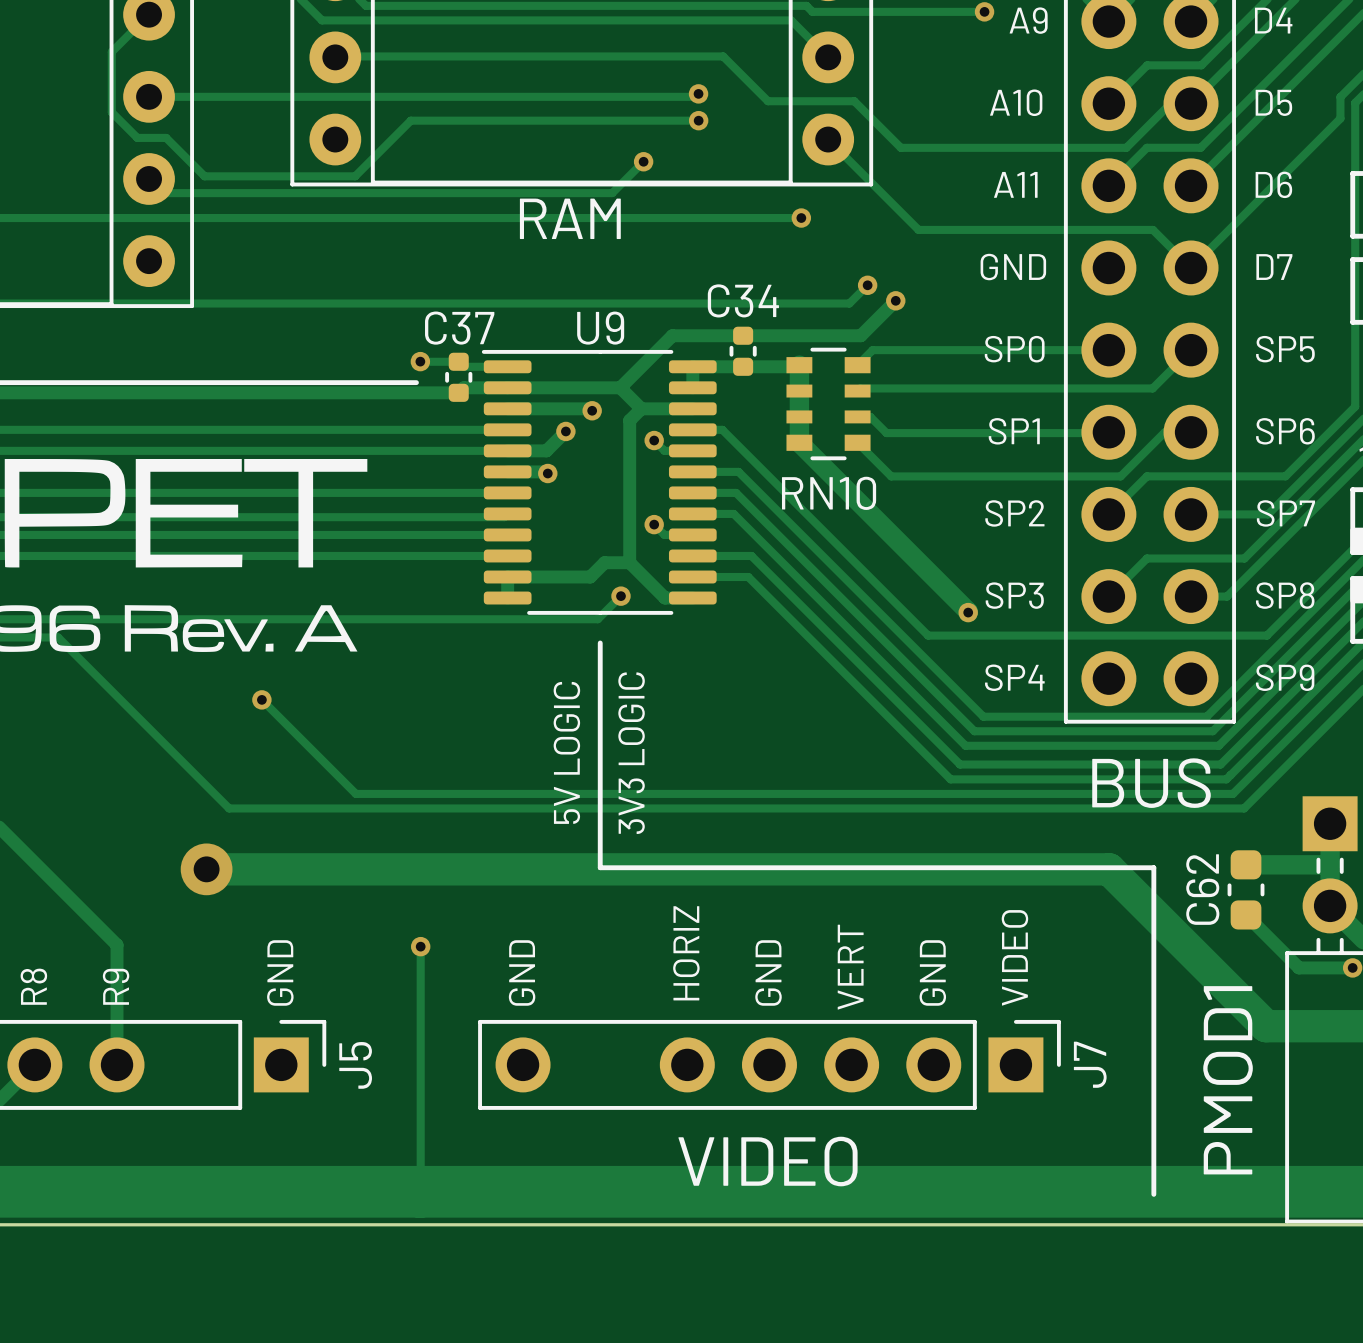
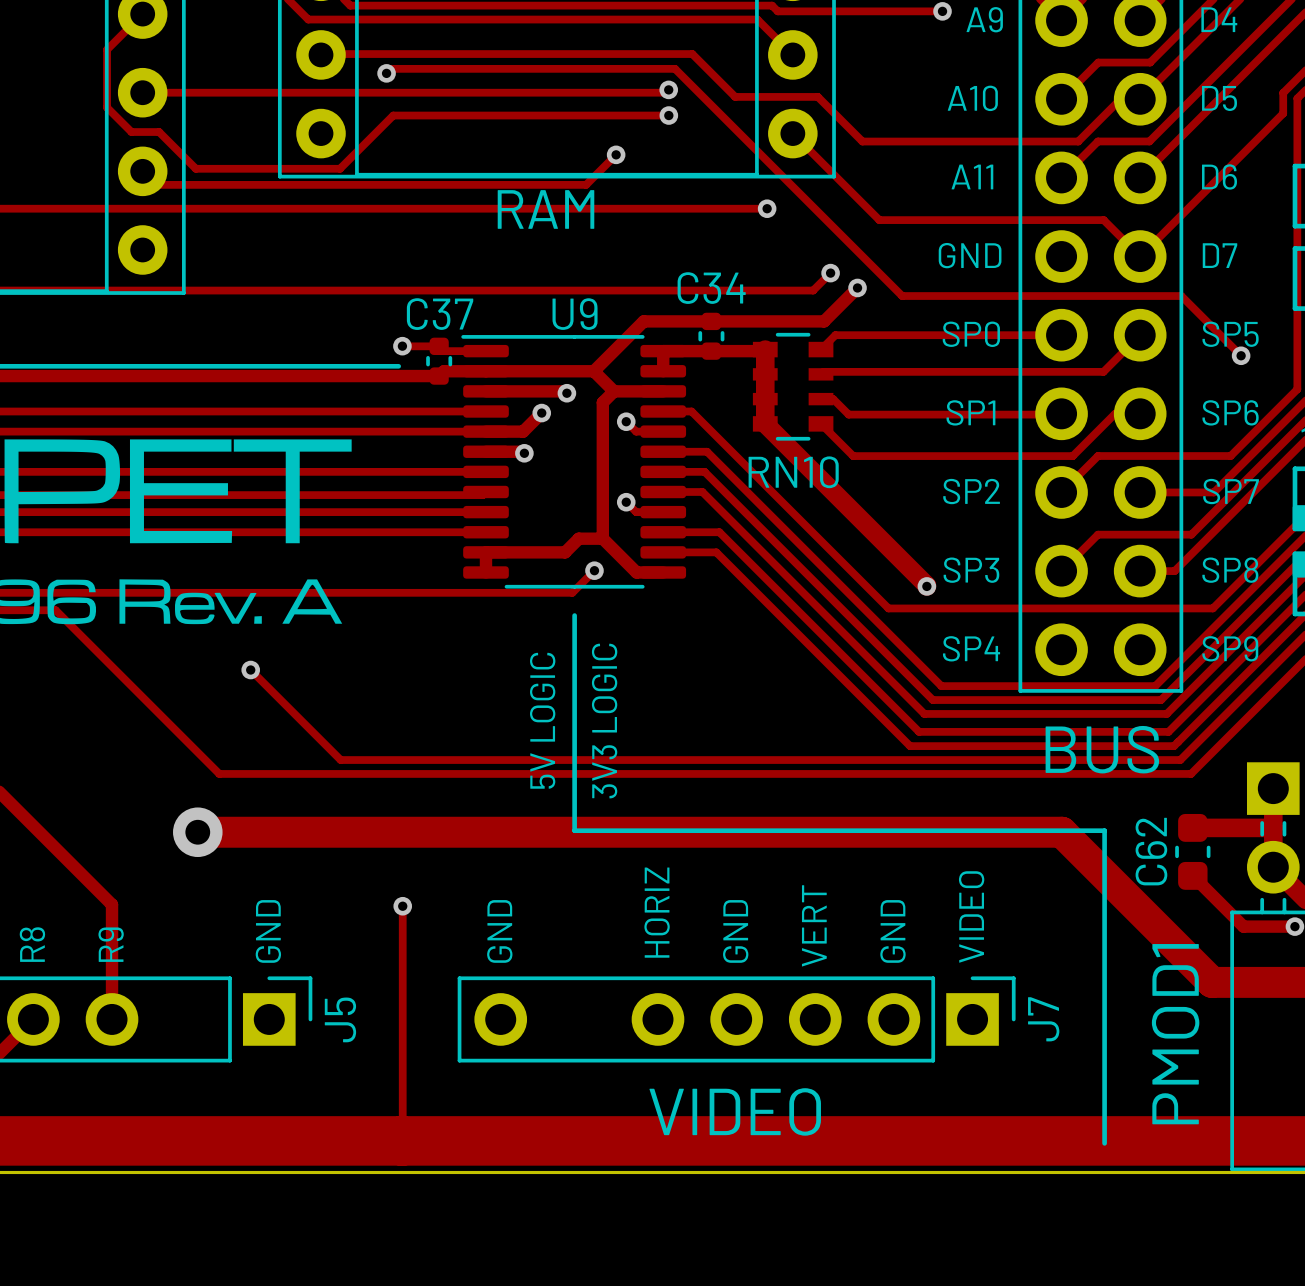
track: none -> (386, 73) (391, 68) (675, 68) (902, 296) (1181, 296) (1241, 355)
via: none -> (386, 73)
via: none -> (1241, 355)

